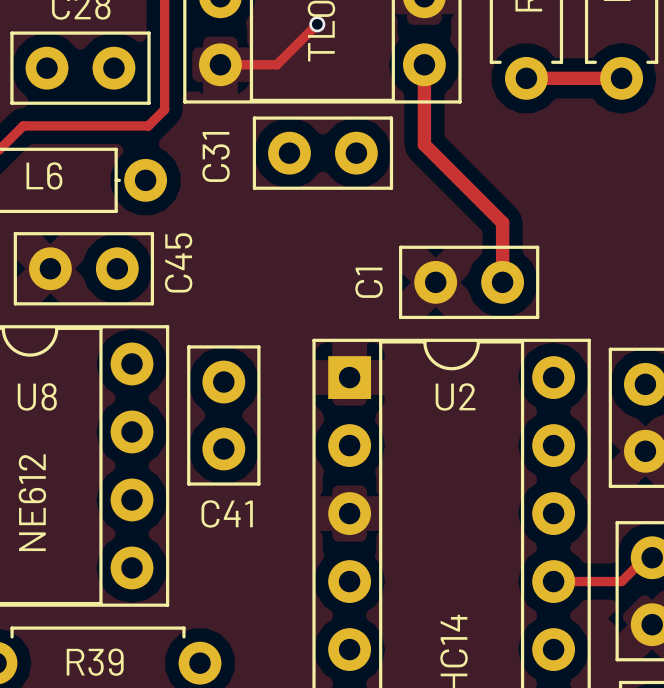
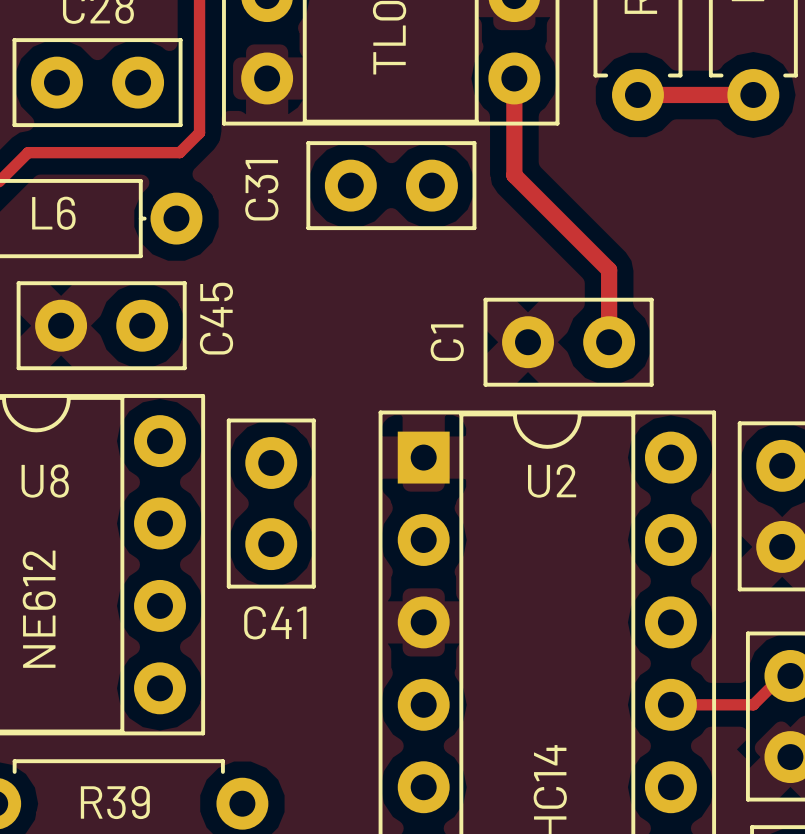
track: (317, 24) (276, 64) (220, 64) -> none
via: (317, 24) -> none

